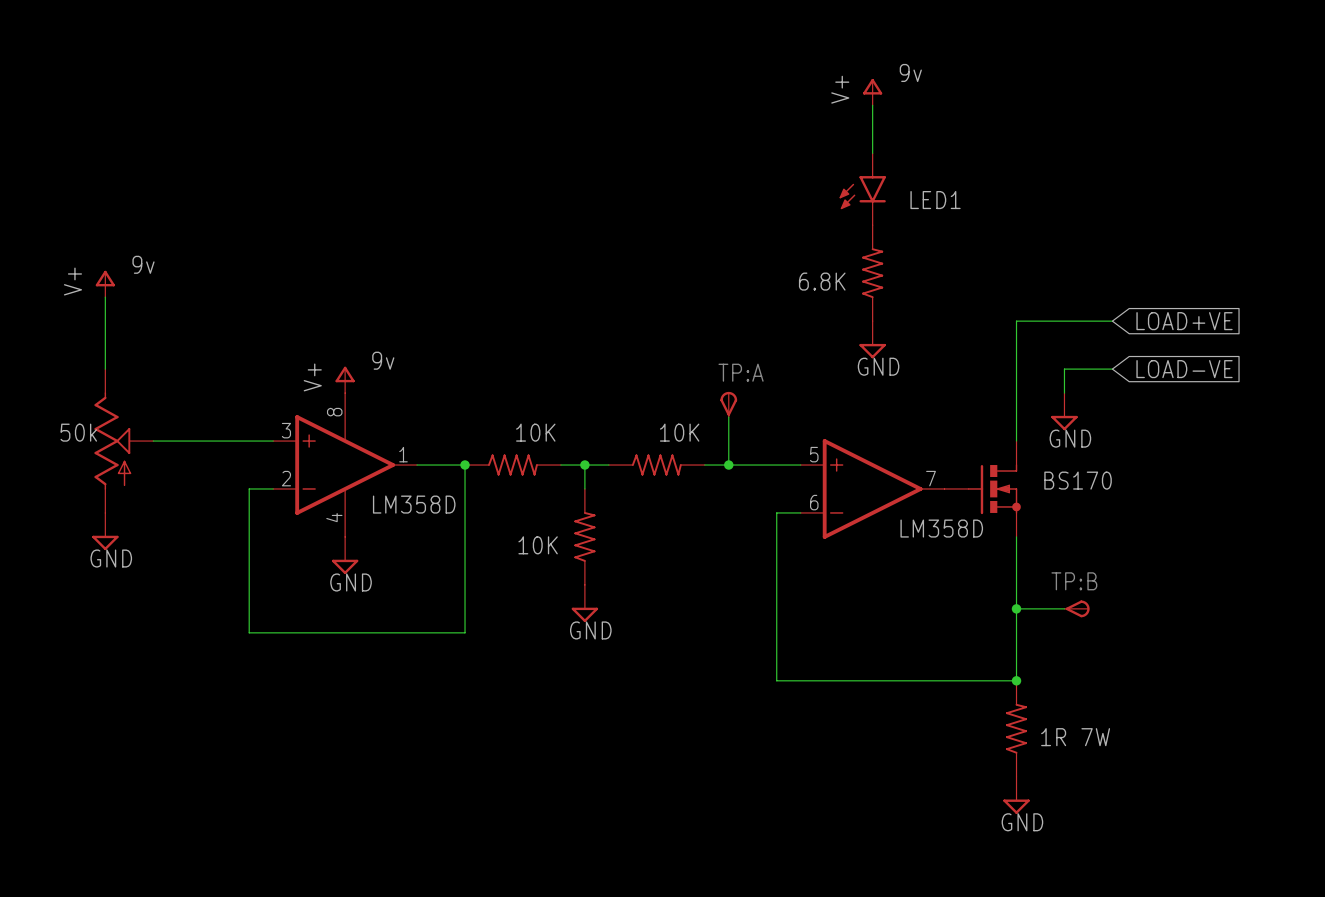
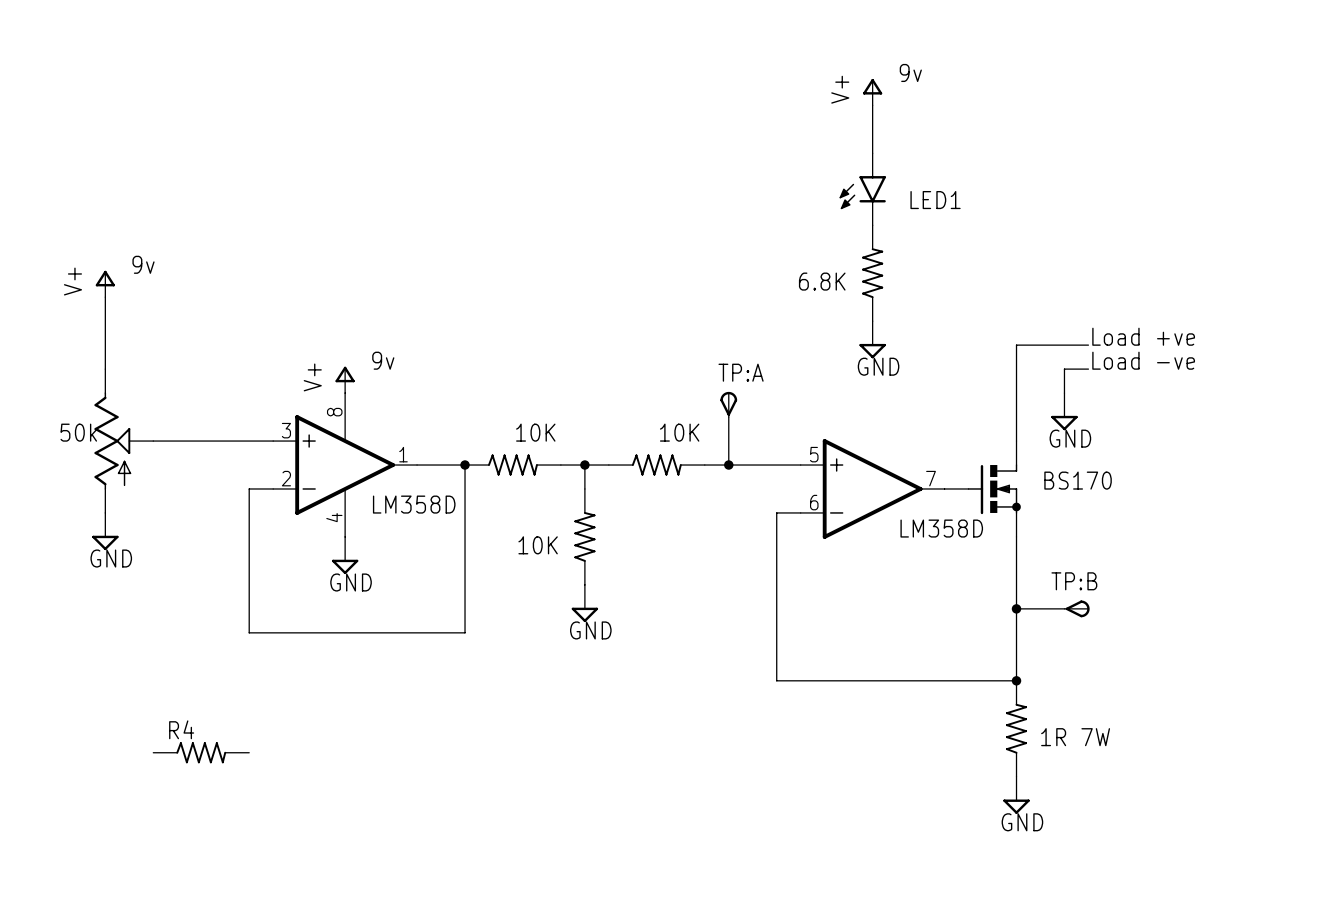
wire: (1112, 321) (1016, 321) (1016, 345) -> (1088, 345) (1016, 345)
global label: LOAD+VE (1184, 321) -> none
text: none -> Load +ve (1143, 336)
text: none -> Load -ve (1143, 360)
global label: LOAD-VE (1184, 369) -> none
R4: none -> (201, 752)

